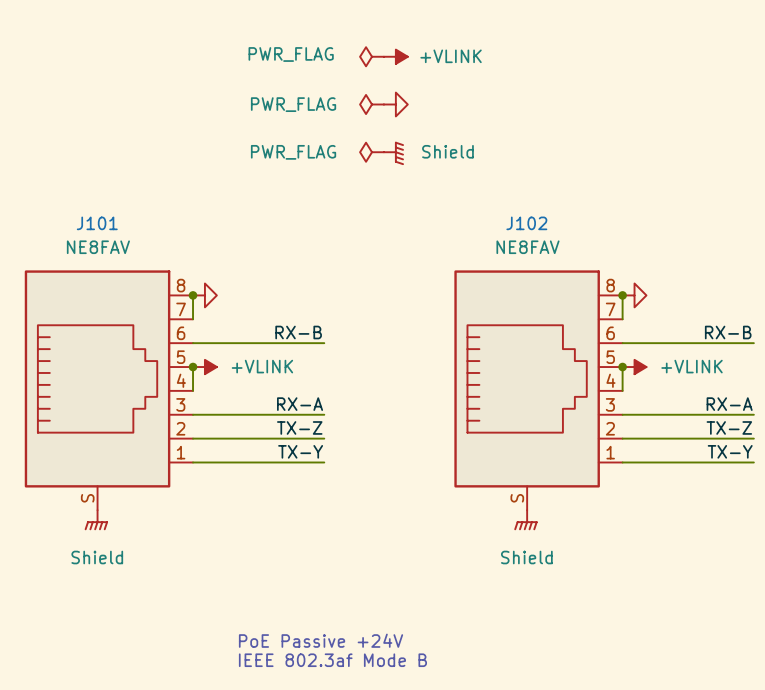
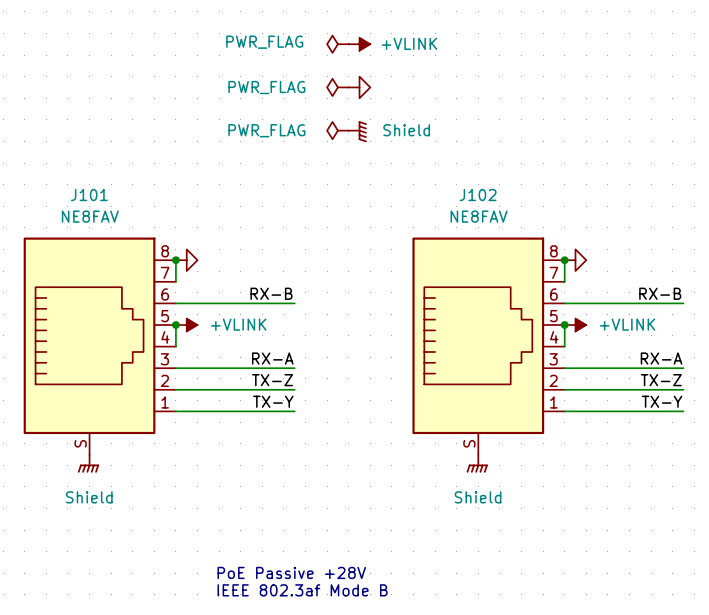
text: PoE Passive +24V (321, 640) -> PoE Passive +28V (291, 572)

